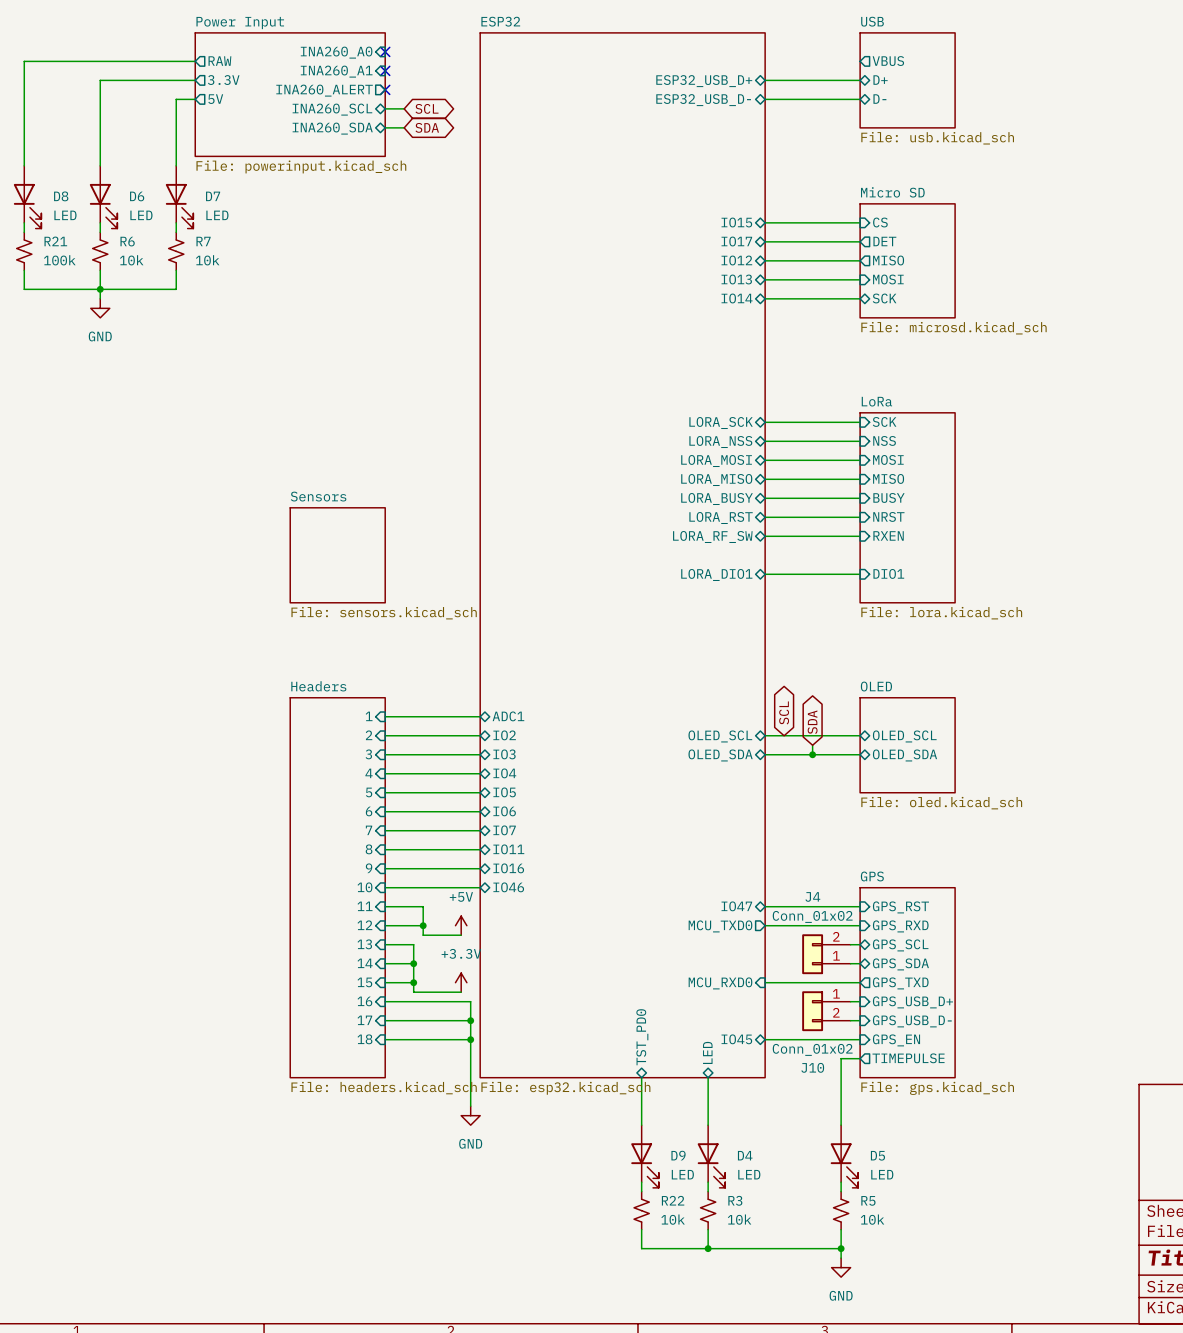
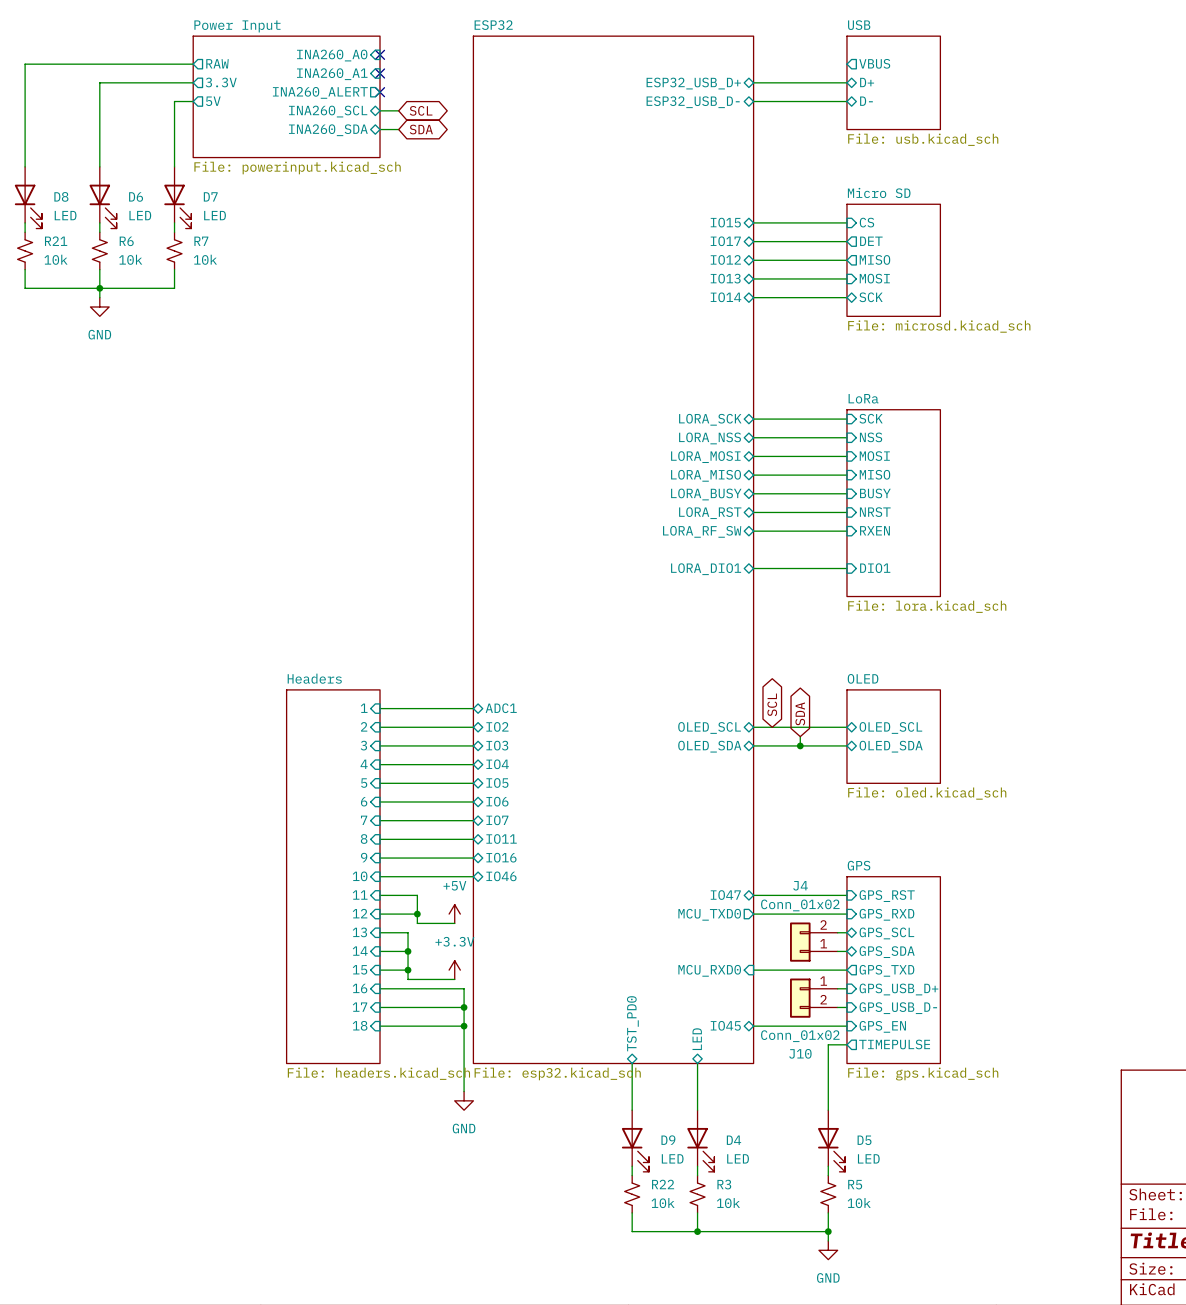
R21 value: 100k (59, 260) -> 10k (56, 259)
sheet Sensors: File: sensors.kicad_sch (337, 555) -> none

